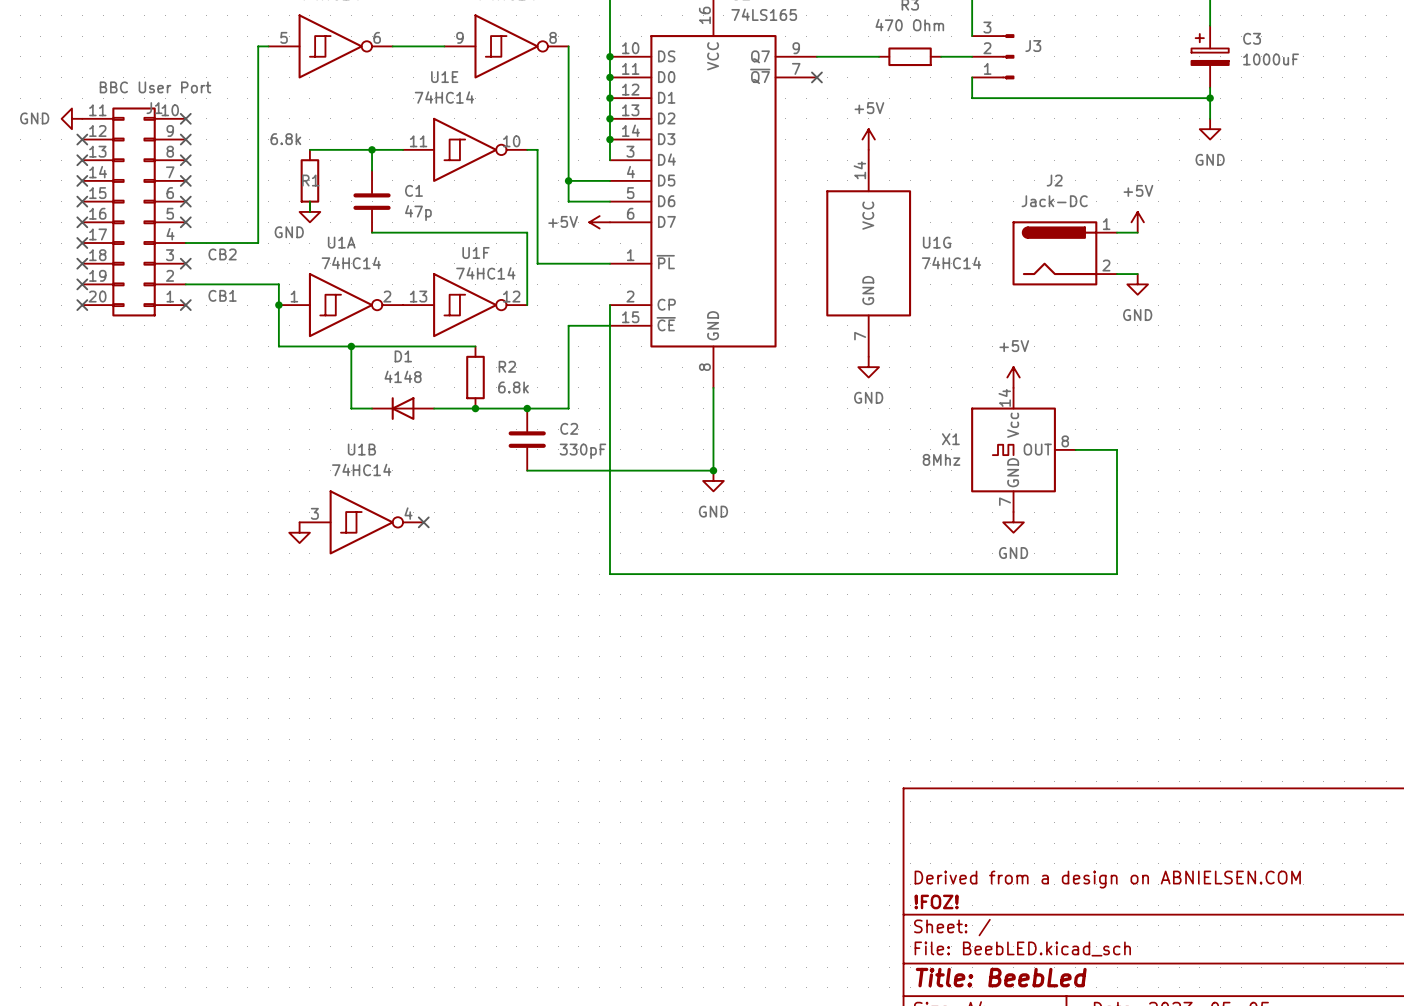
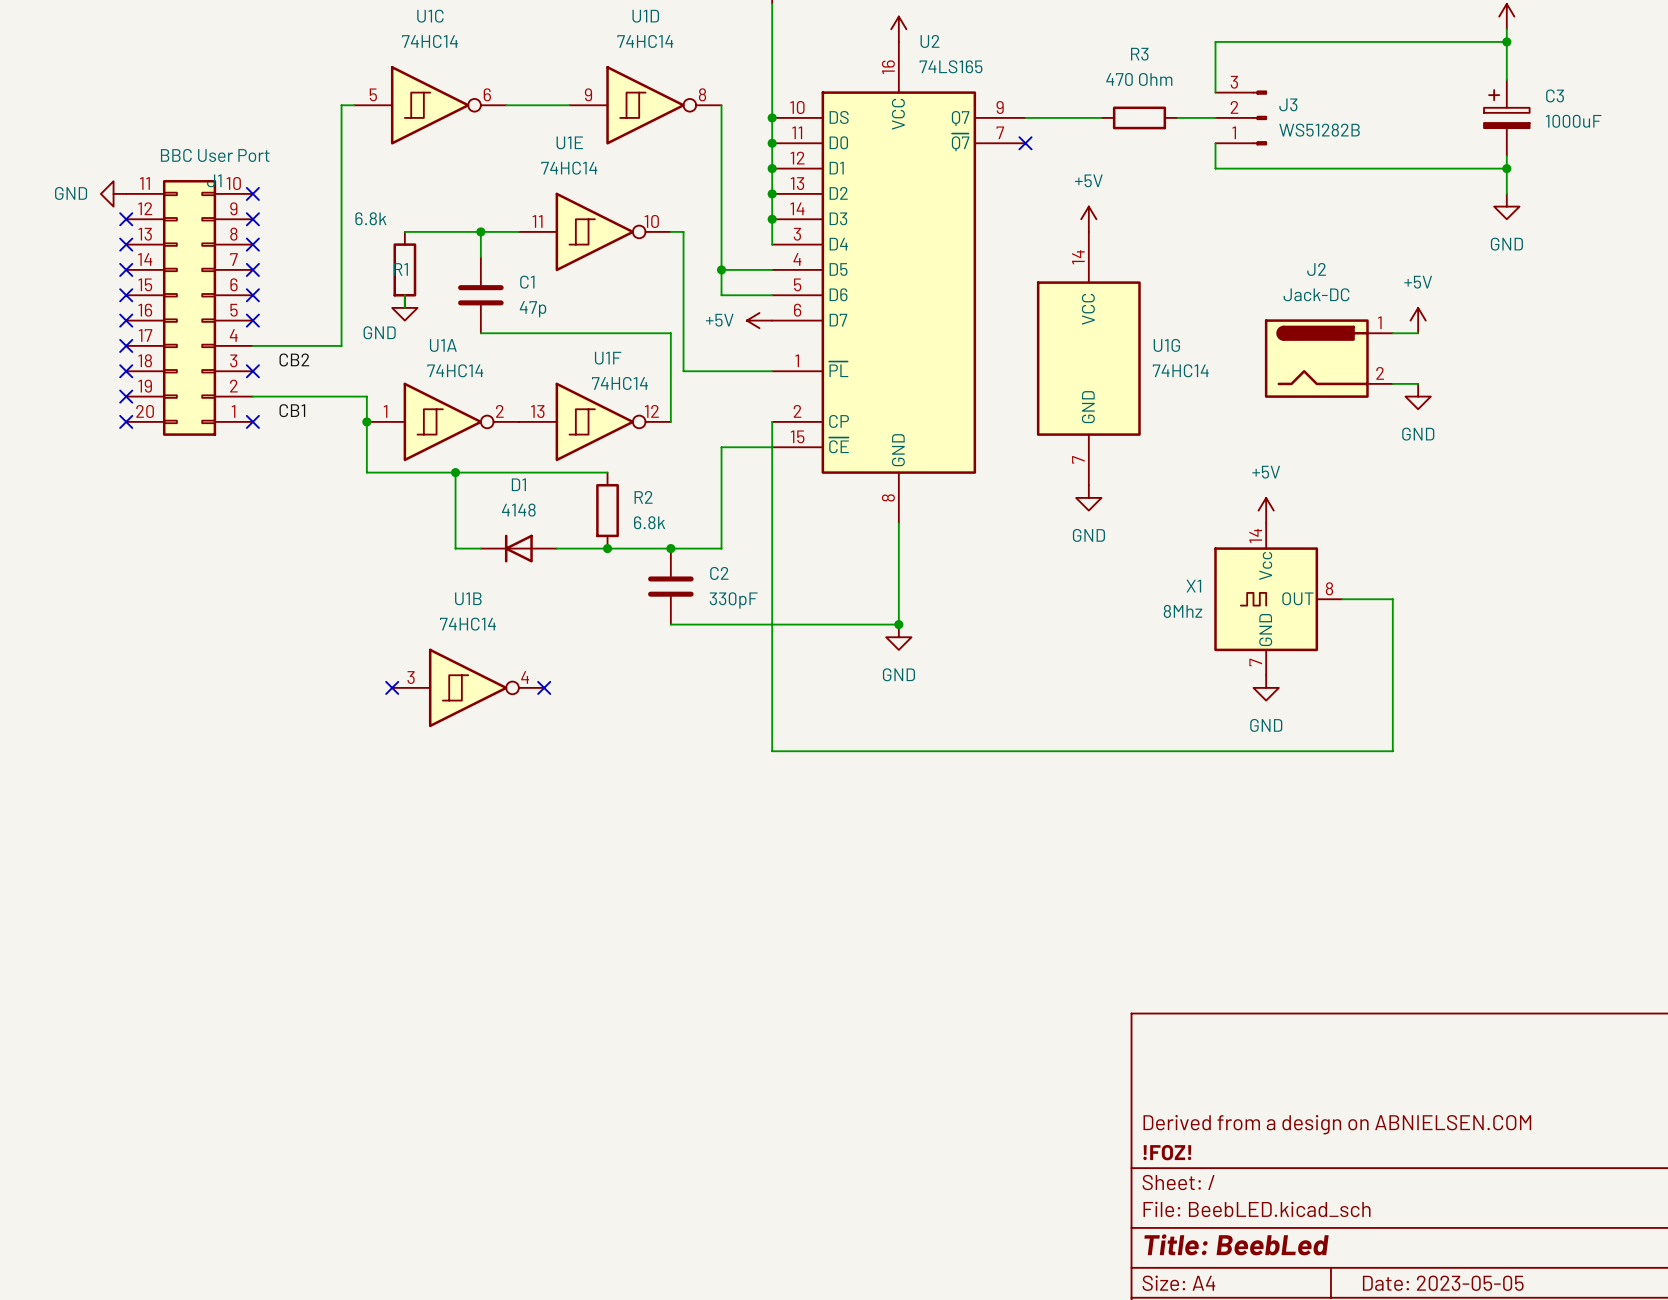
J3 value: none -> WS51282B (1319, 130)
no-connect mark: none -> (392, 687)
power symbol: (299, 532) -> none

